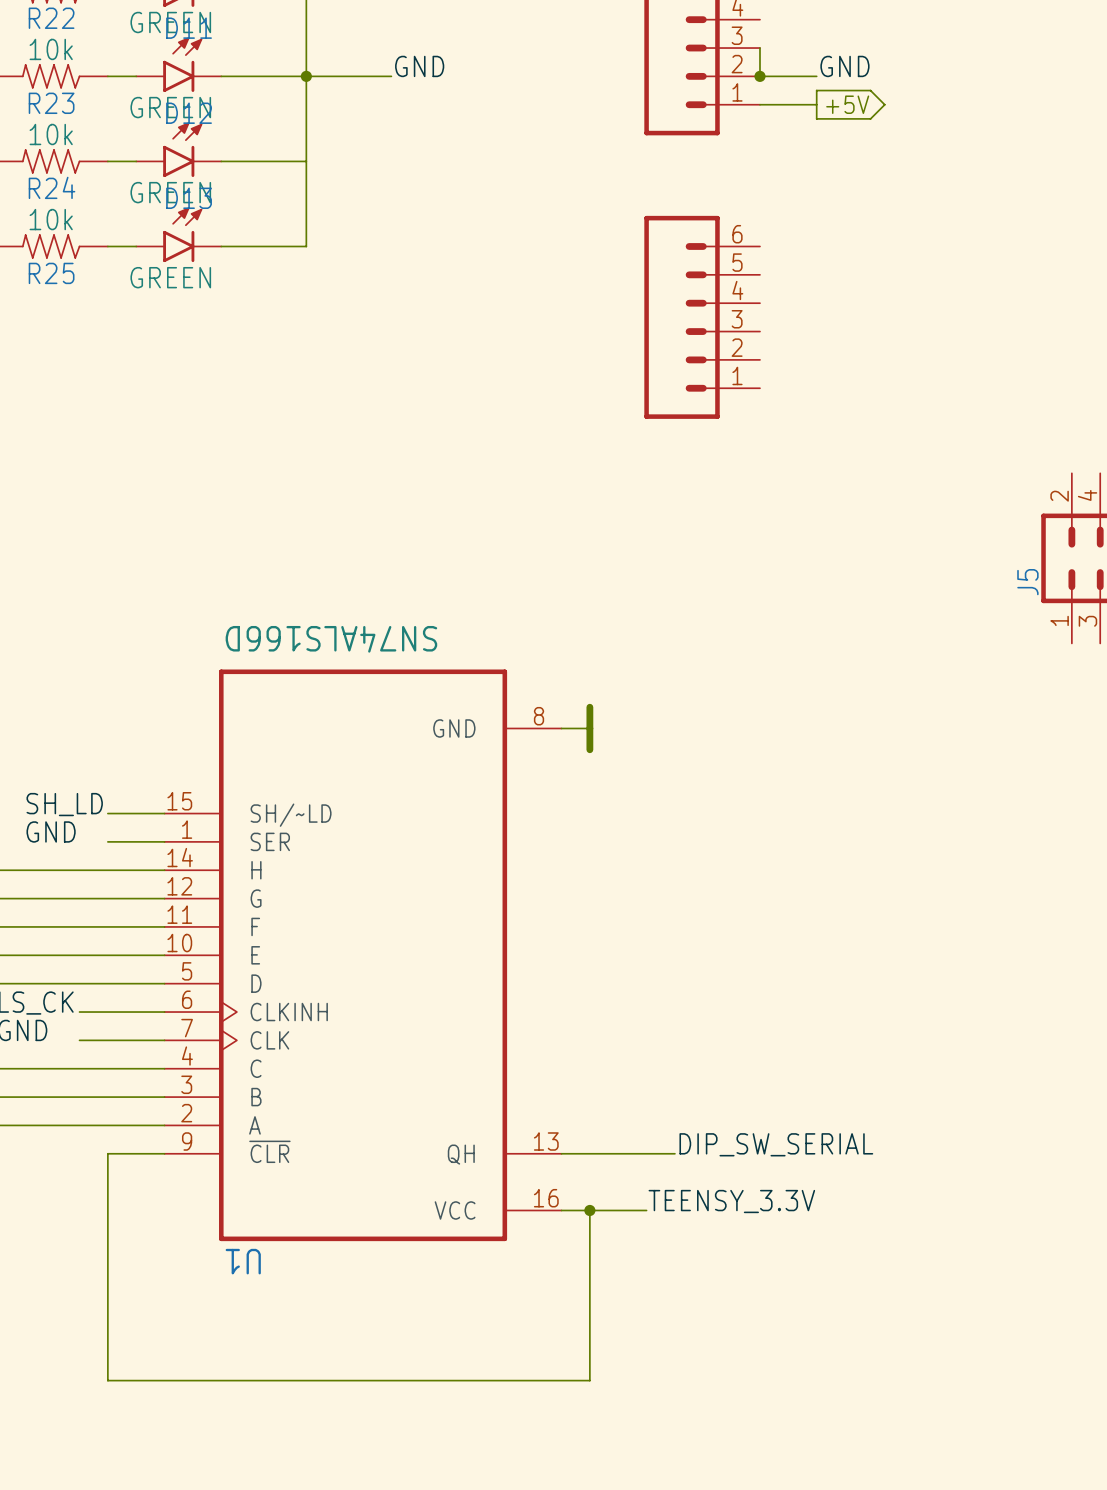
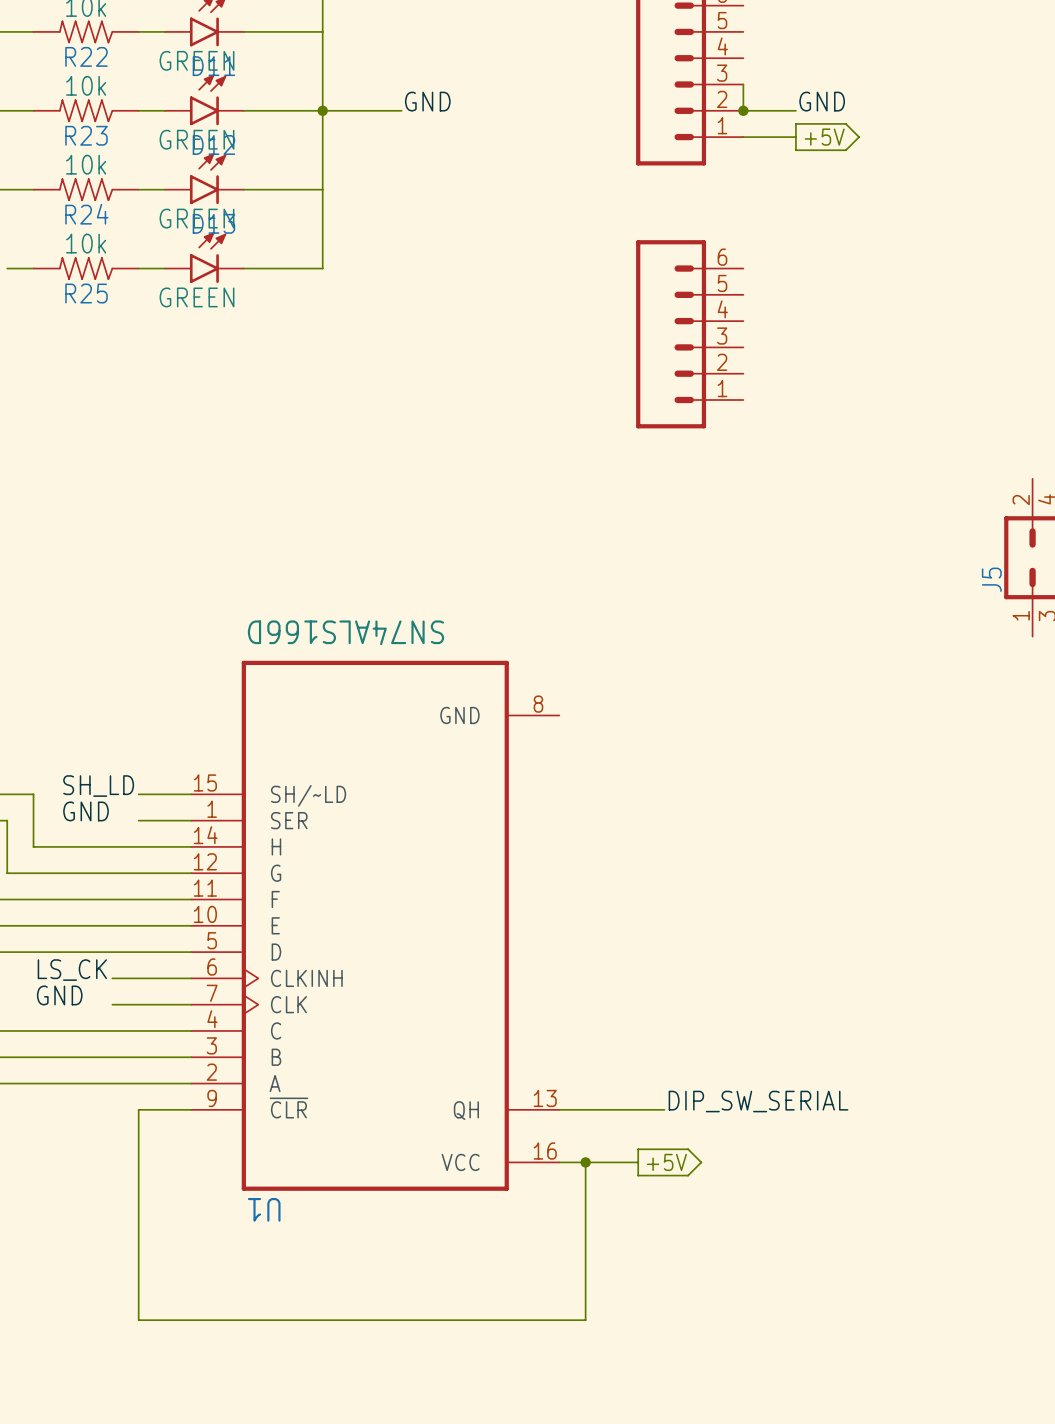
power symbol: (576, 728) -> none
label: TEENSY_3.3V (731, 1201) -> none
power symbol: none -> (669, 1162)

